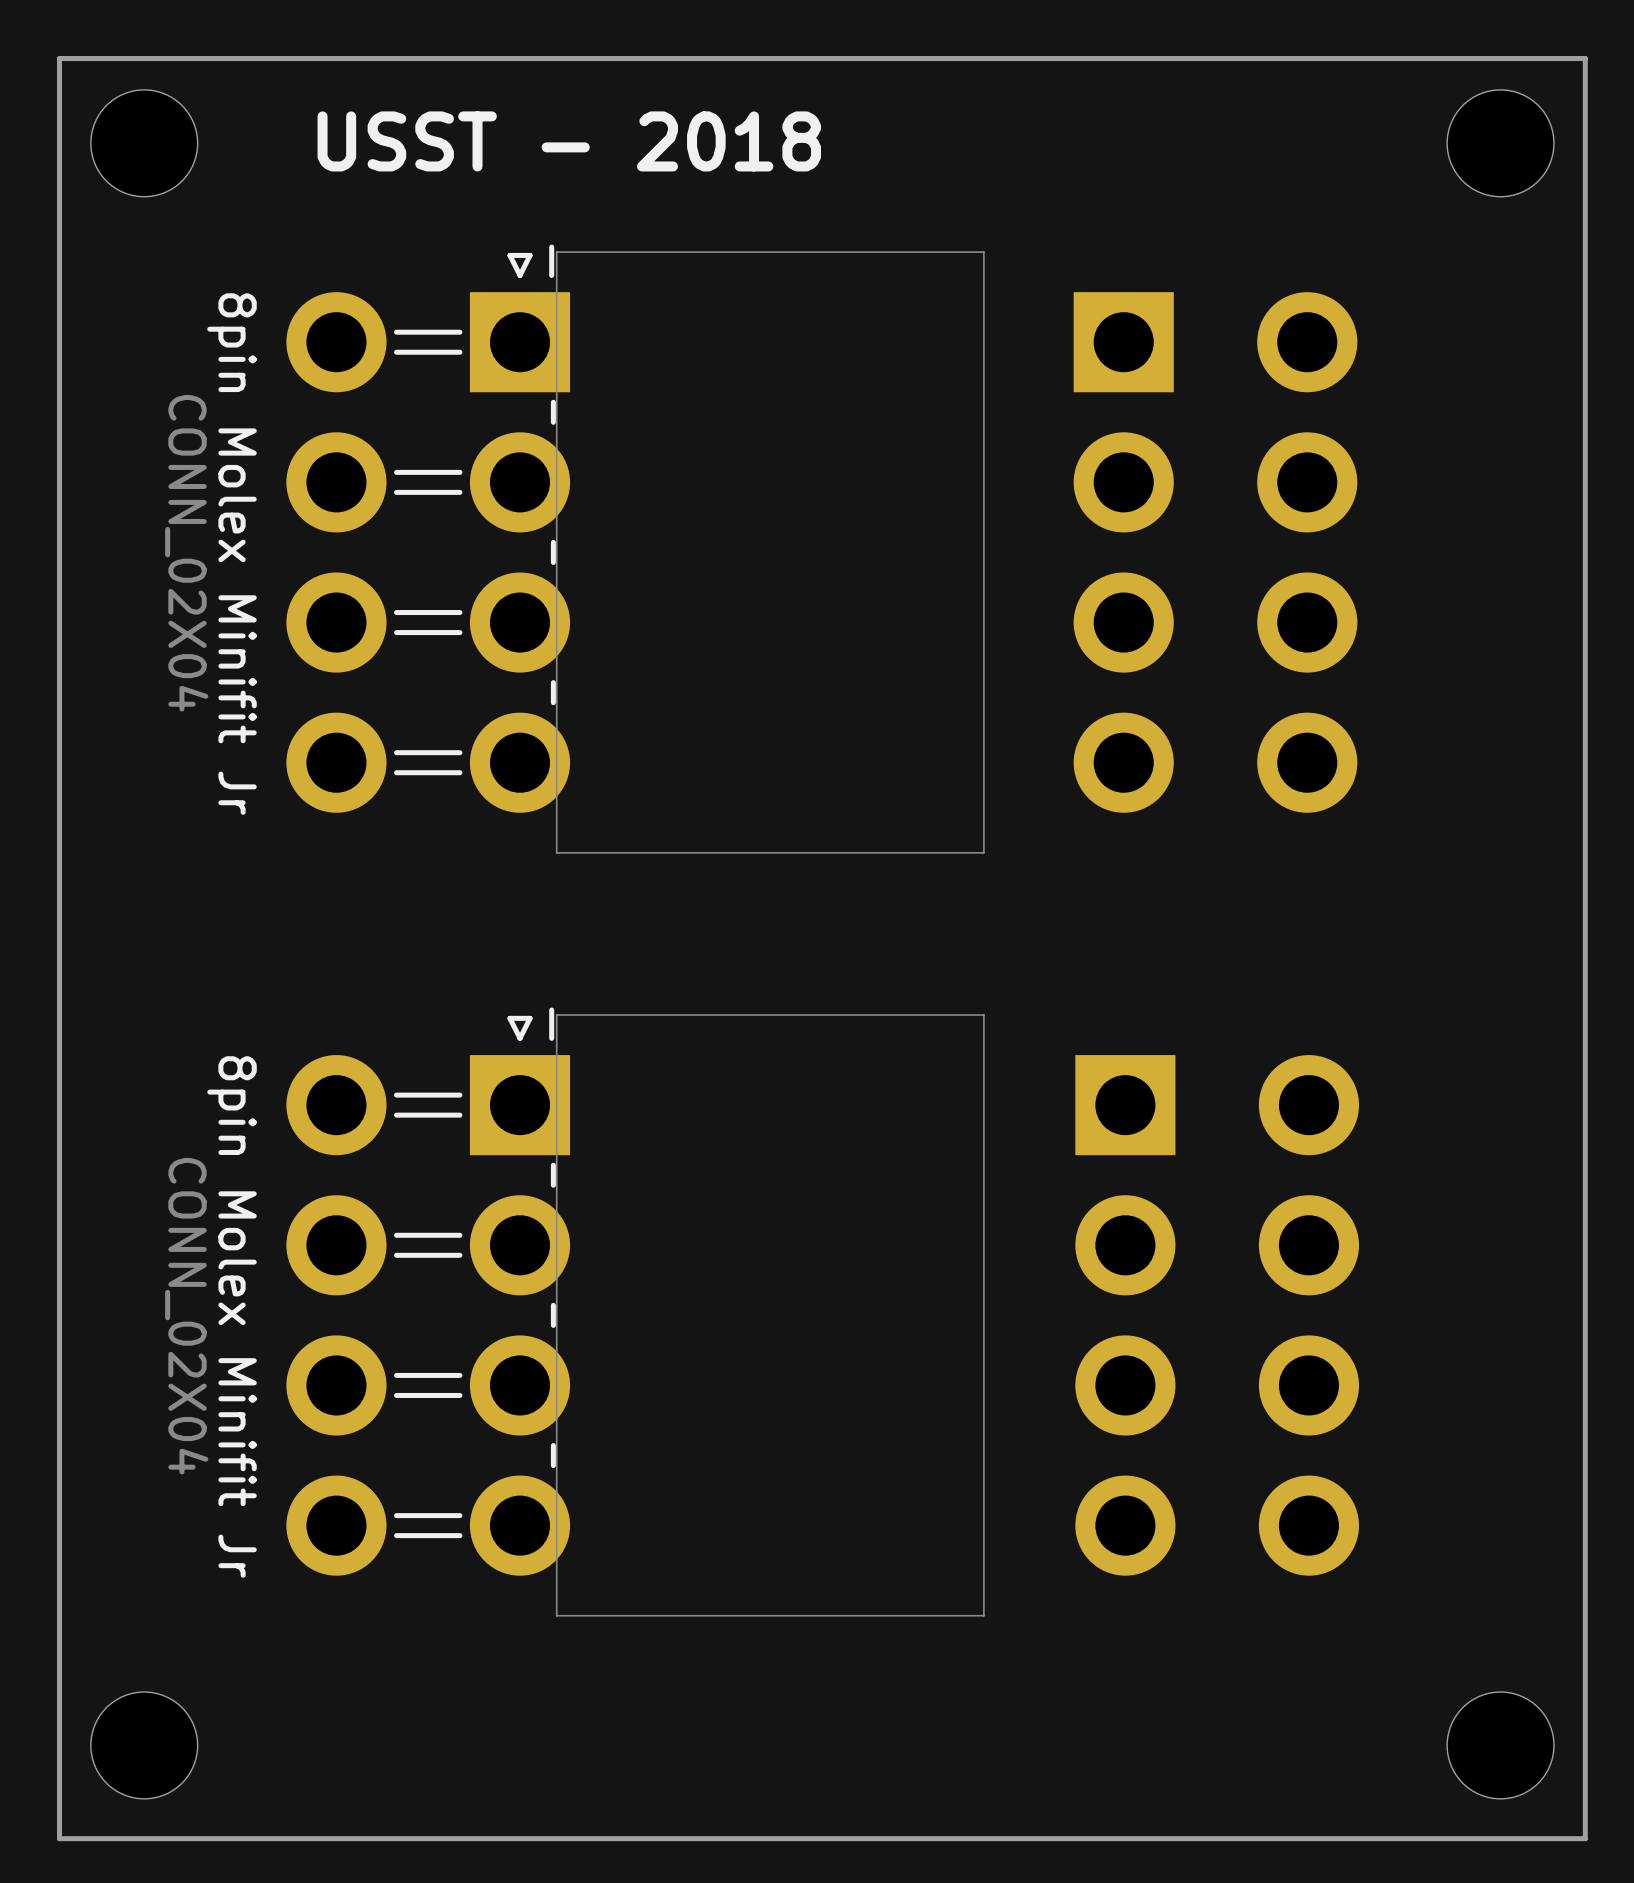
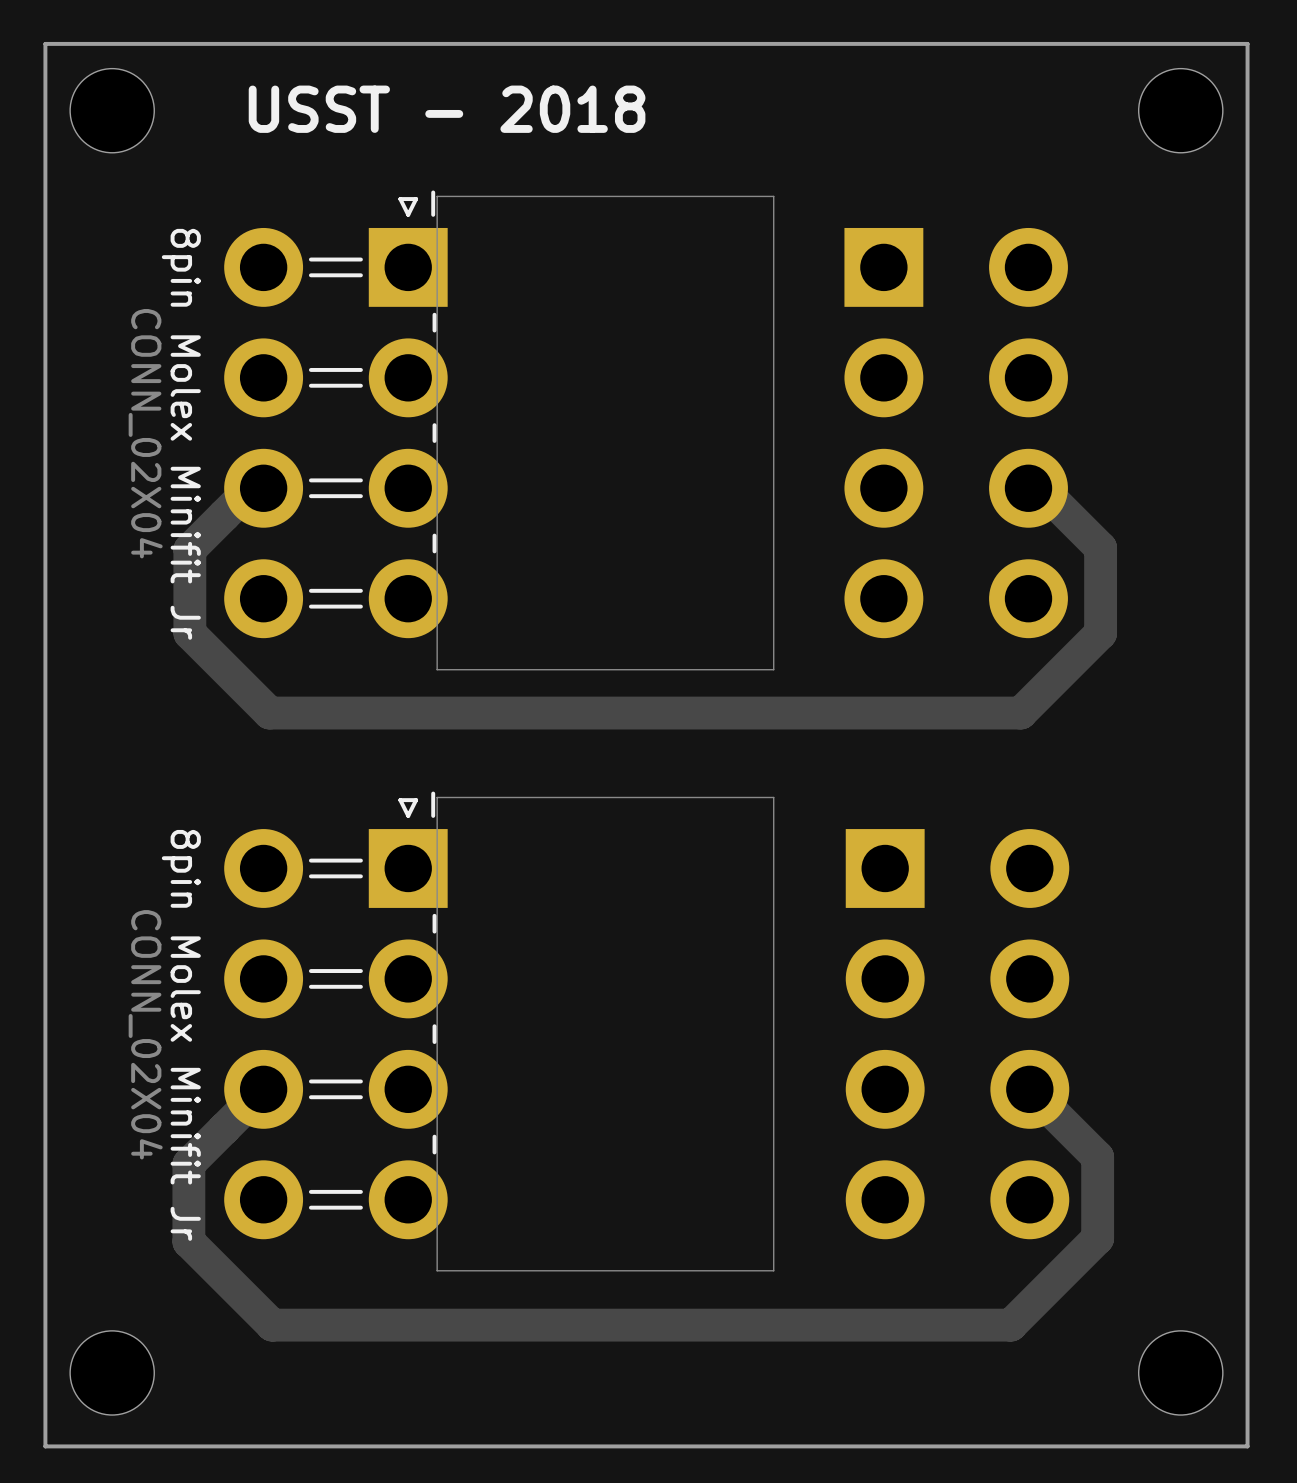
track: none -> (1028, 475) (1100, 547) (1100, 633) (1020, 713) (269, 713) (189, 633) (189, 549) (263, 475)
track: none -> (1029, 1089) (1097, 1157) (1097, 1238) (1010, 1325) (272, 1325) (188, 1241) (188, 1164) (263, 1089)

